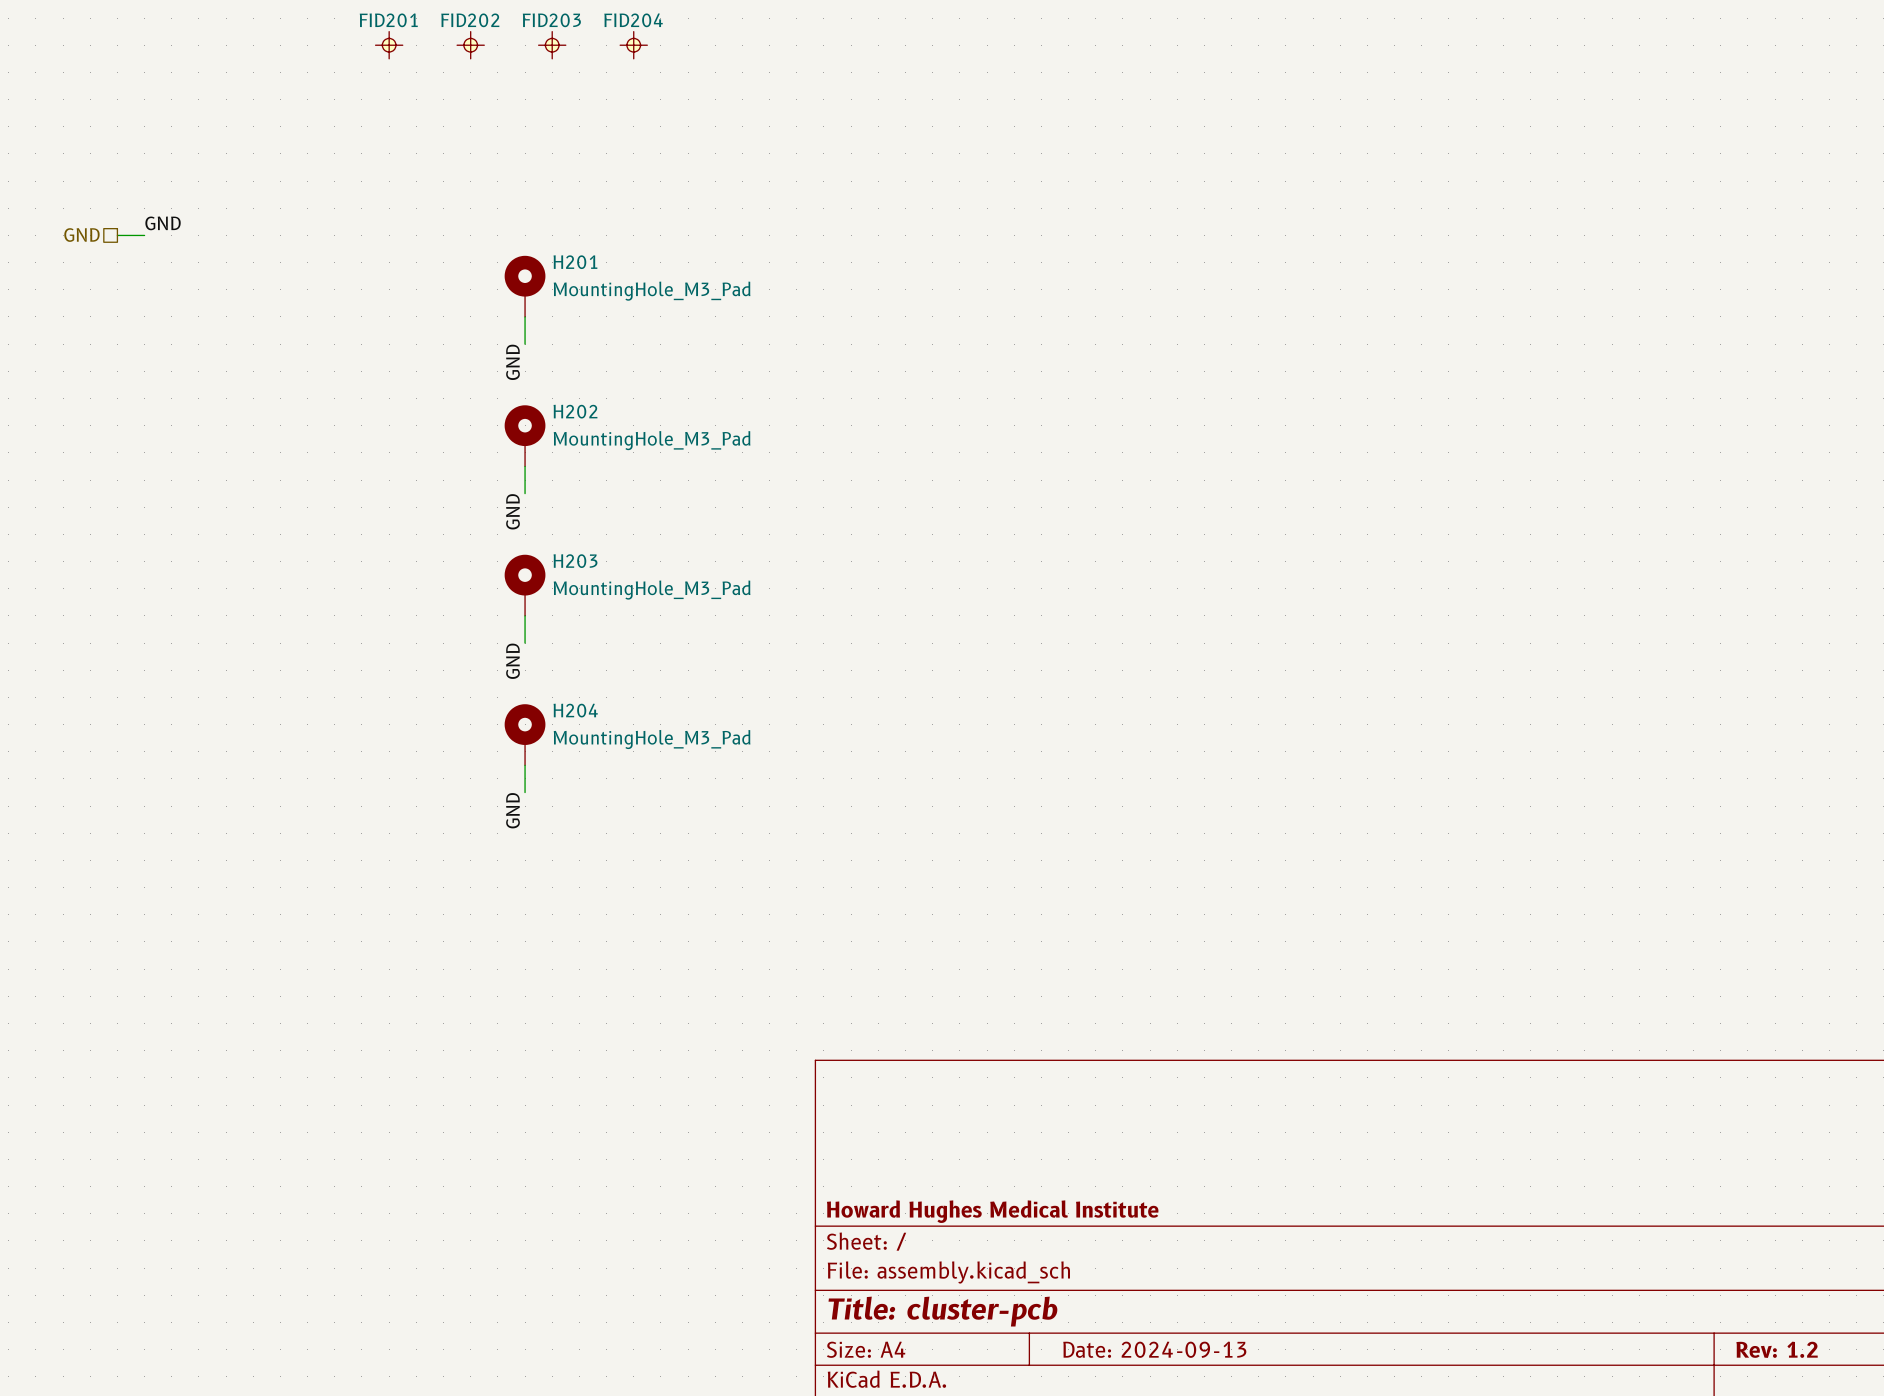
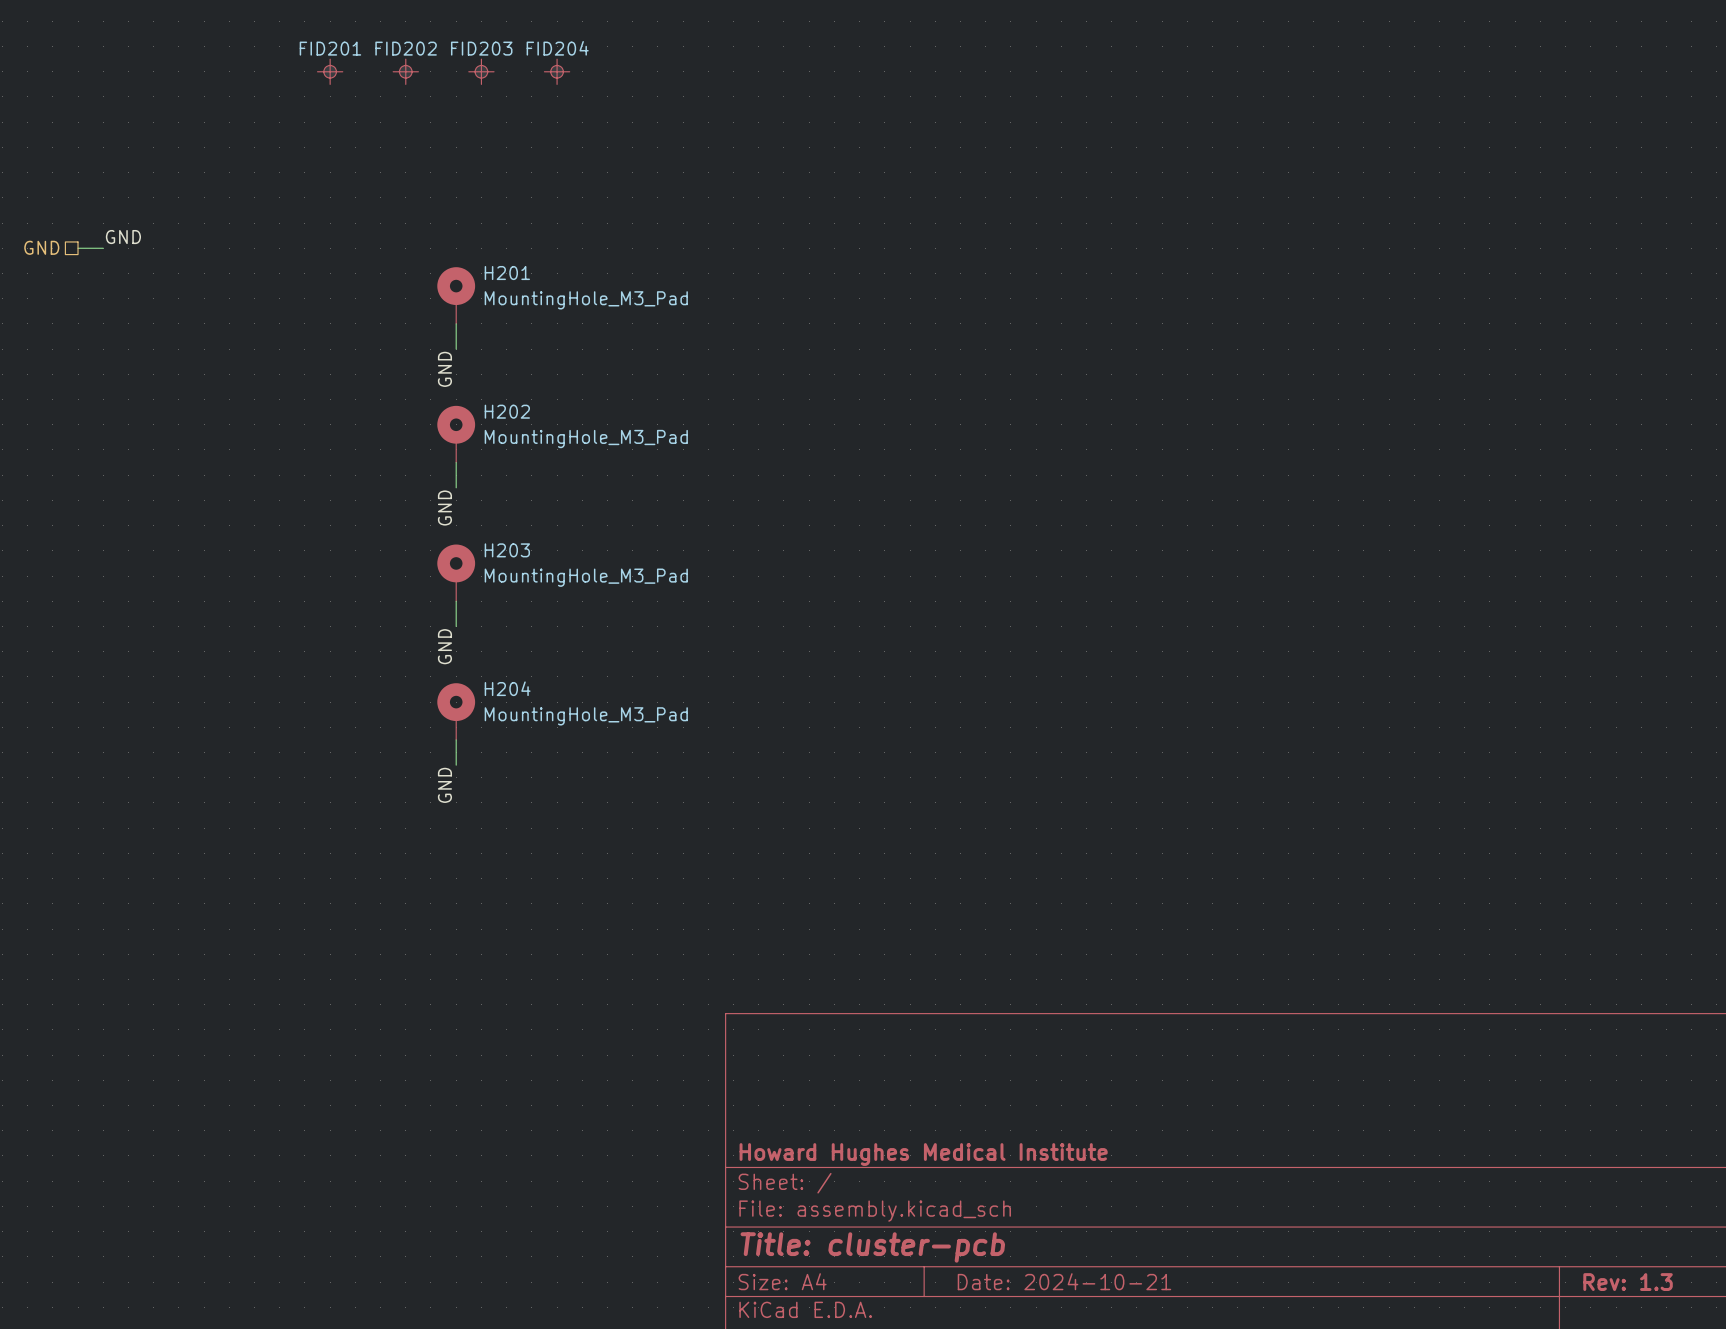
title block: Date: 2024-09-13 (1154, 1349) -> Date: 2024-10-21 (1064, 1281)
title block: Rev: 1.2 (1777, 1349) -> Rev: 1.3 (1628, 1282)

